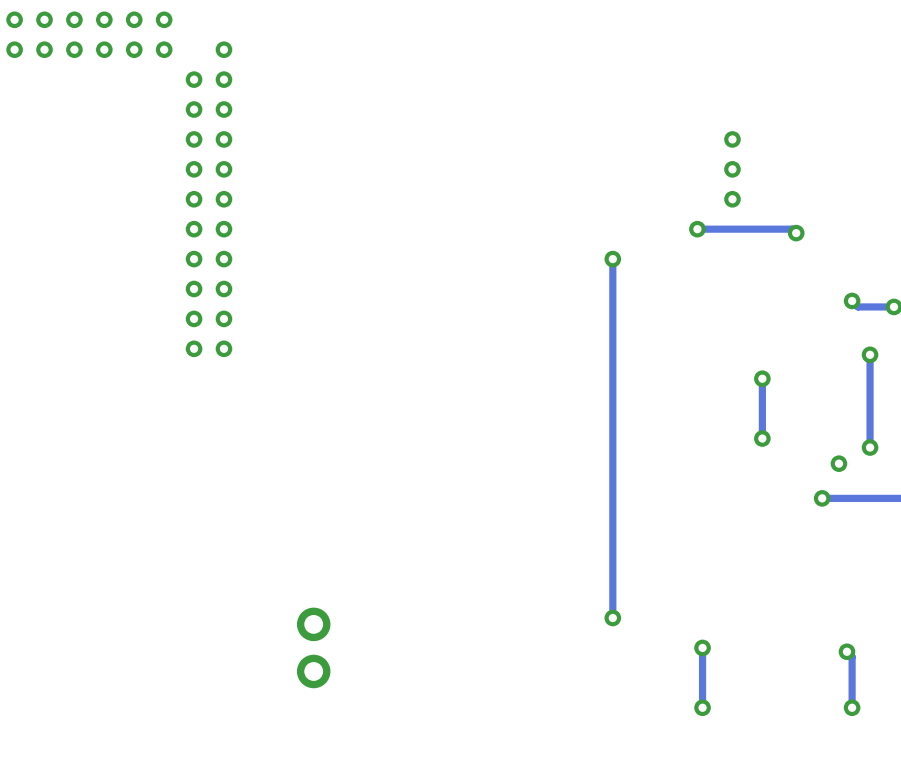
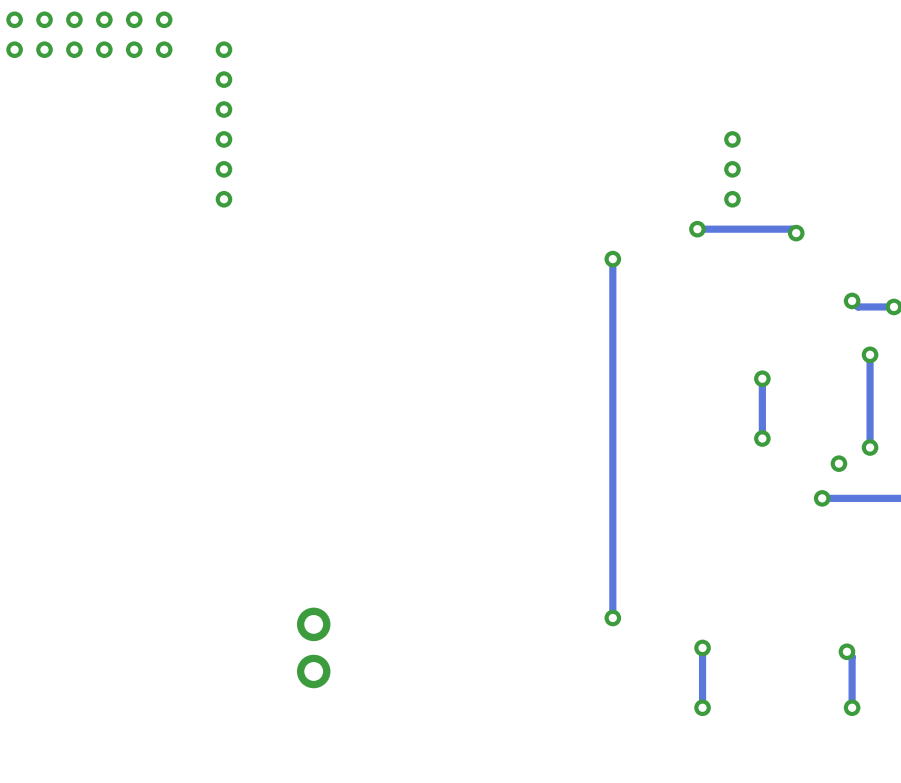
via: (194, 79) -> none
via: (194, 109) -> none
via: (194, 139) -> none
via: (194, 169) -> none
via: (194, 199) -> none
via: (194, 229) -> none
via: (223, 229) -> none
via: (194, 259) -> none
via: (223, 259) -> none
via: (194, 289) -> none
via: (223, 289) -> none
via: (194, 318) -> none
via: (223, 318) -> none
via: (194, 348) -> none
via: (223, 348) -> none

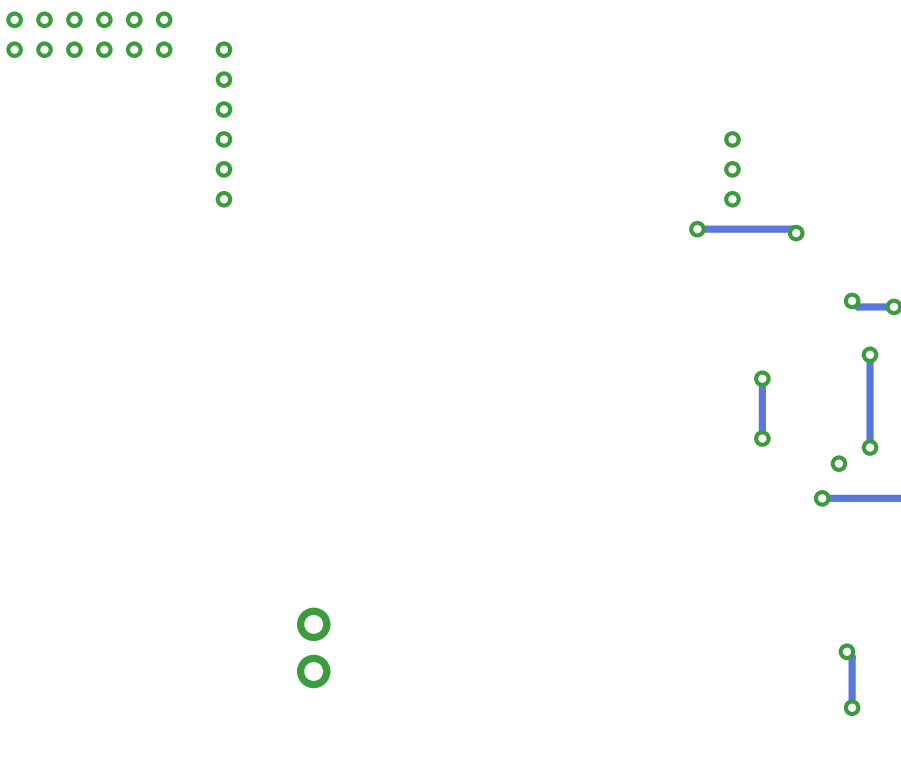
track: (612, 259) (612, 618) -> none
via: (612, 259) -> none
via: (612, 618) -> none
track: (702, 647) (702, 707) -> none
via: (702, 647) -> none
via: (702, 707) -> none

